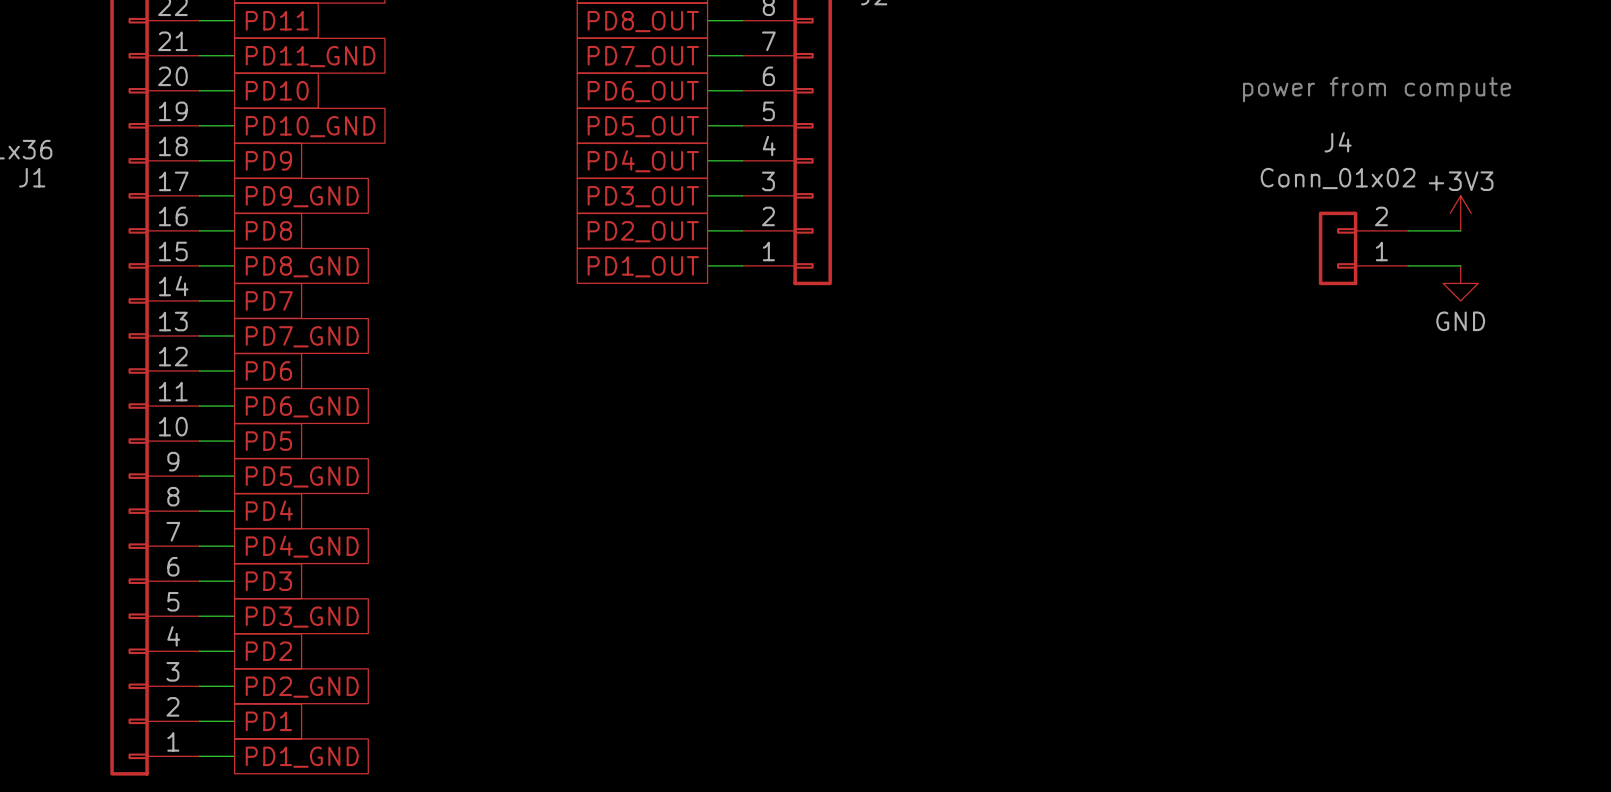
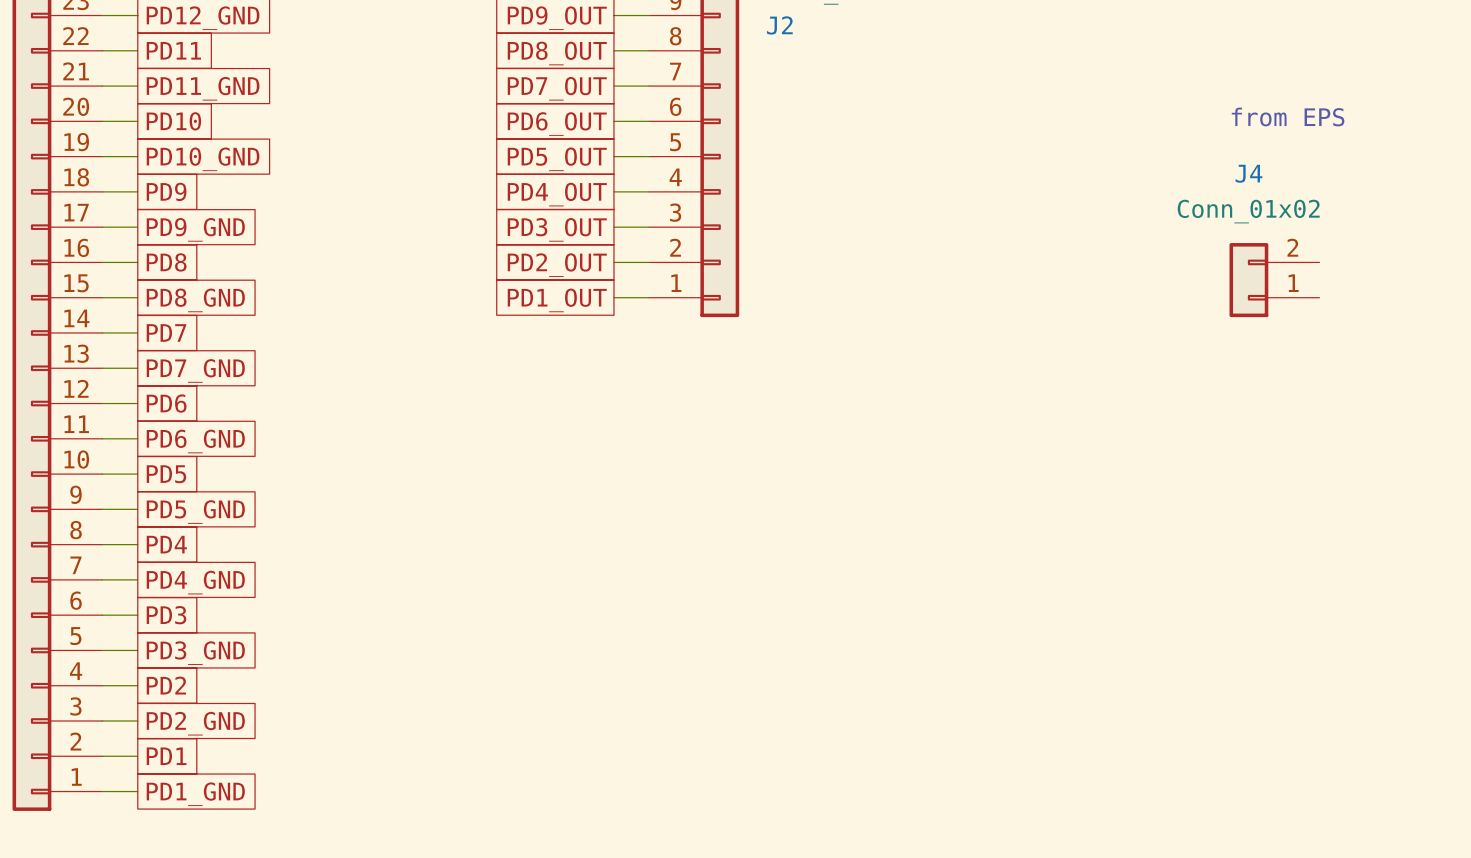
text: power from compute (1377, 89) -> from EPS (1288, 117)
power symbol: +3V3 (1460, 213) -> none
wire: (1408, 230) (1460, 230) -> none
wire: (1408, 265) (1460, 265) -> none
power symbol: GND (1460, 283) -> none

